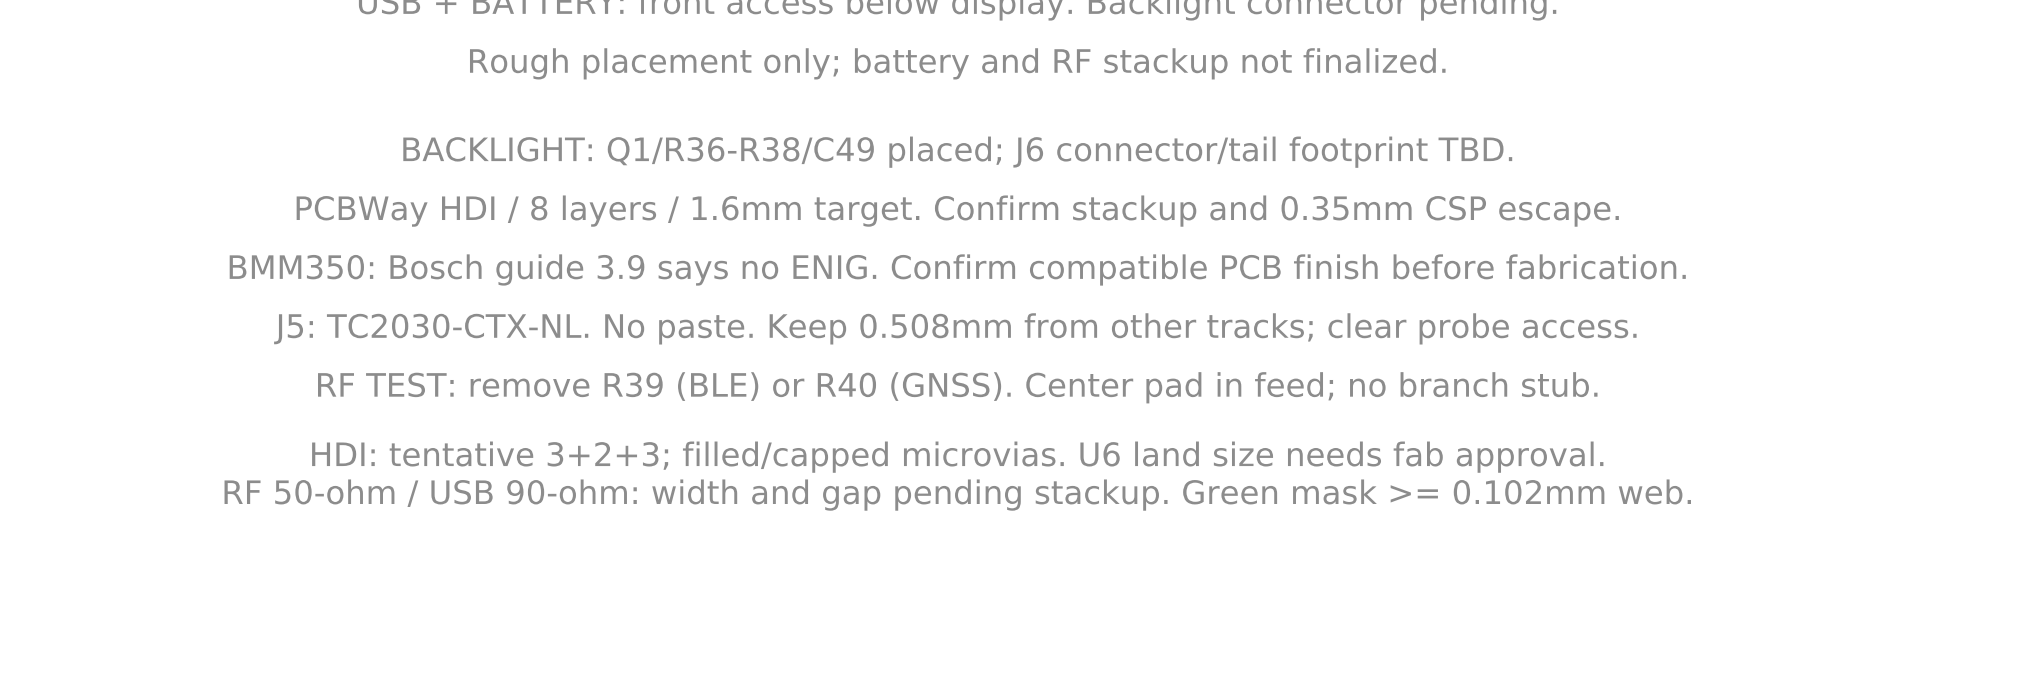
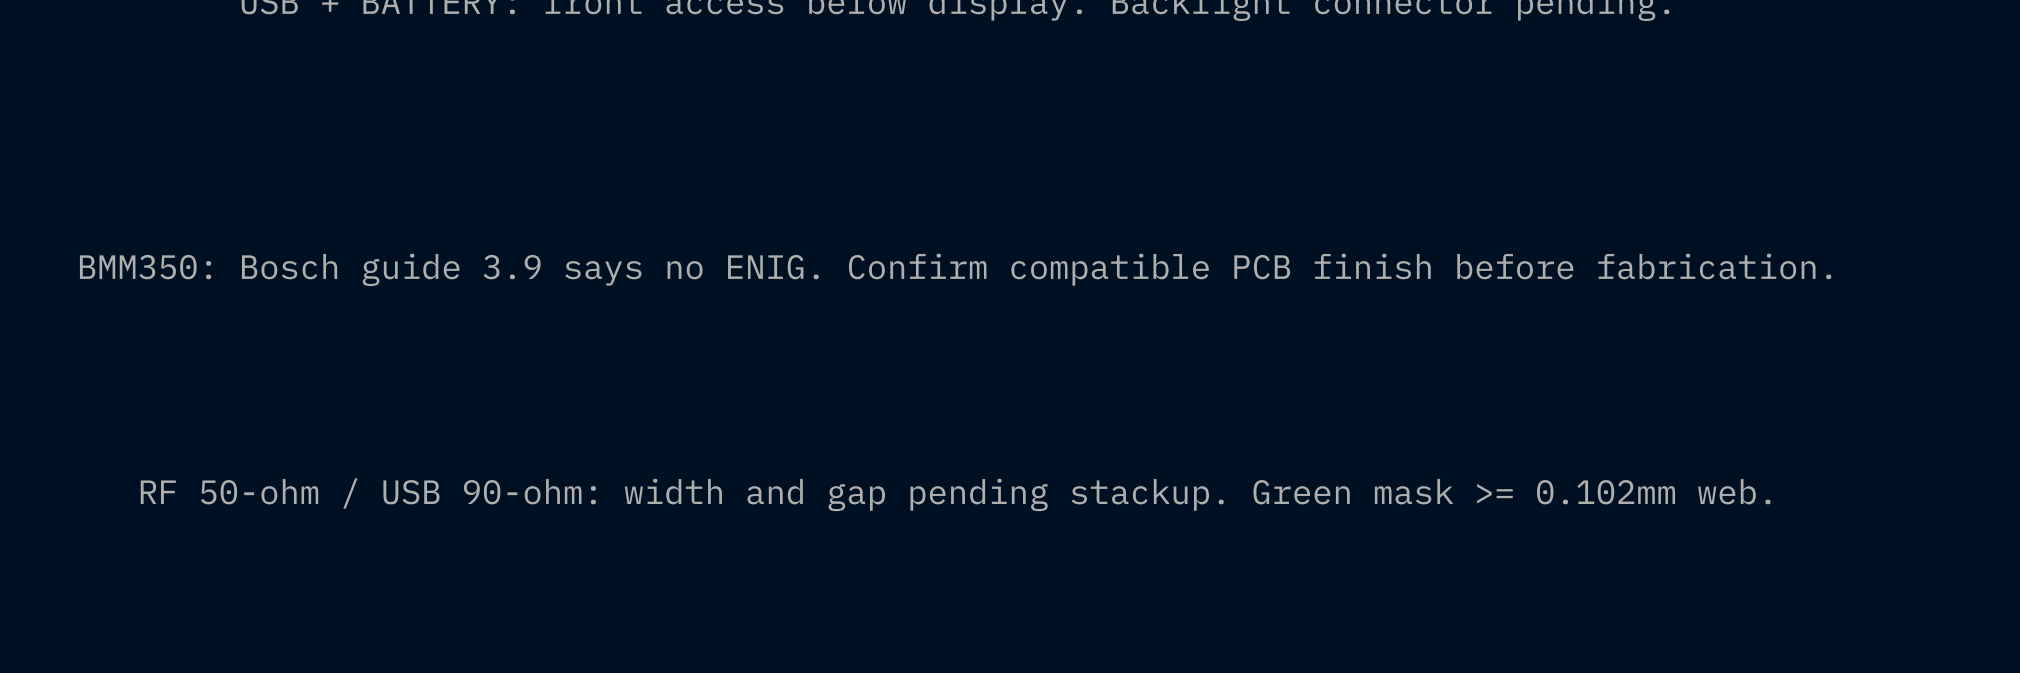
text: Rough placement only; battery and RF stackup not finalized. (957, 63) -> none
text: BACKLIGHT: Q1/R36-R38/C49 placed; J6 connector/tail footprint TBD. (957, 152) -> none
text: PCBWay HDI / 8 layers / 1.6mm target. Confirm stackup and 0.35mm CSP escape. (957, 211) -> none
text: J5: TC2030-CTX-NL. No paste. Keep 0.508mm from other tracks; clear probe access. (955, 328) -> none
text: RF TEST: remove R39 (BLE) or R40 (GNSS). Center pad in feed; no branch stub. (957, 387) -> none
text: HDI: tentative 3+2+3; filled/capped microvias. U6 land size needs fab approval. (957, 457) -> none

